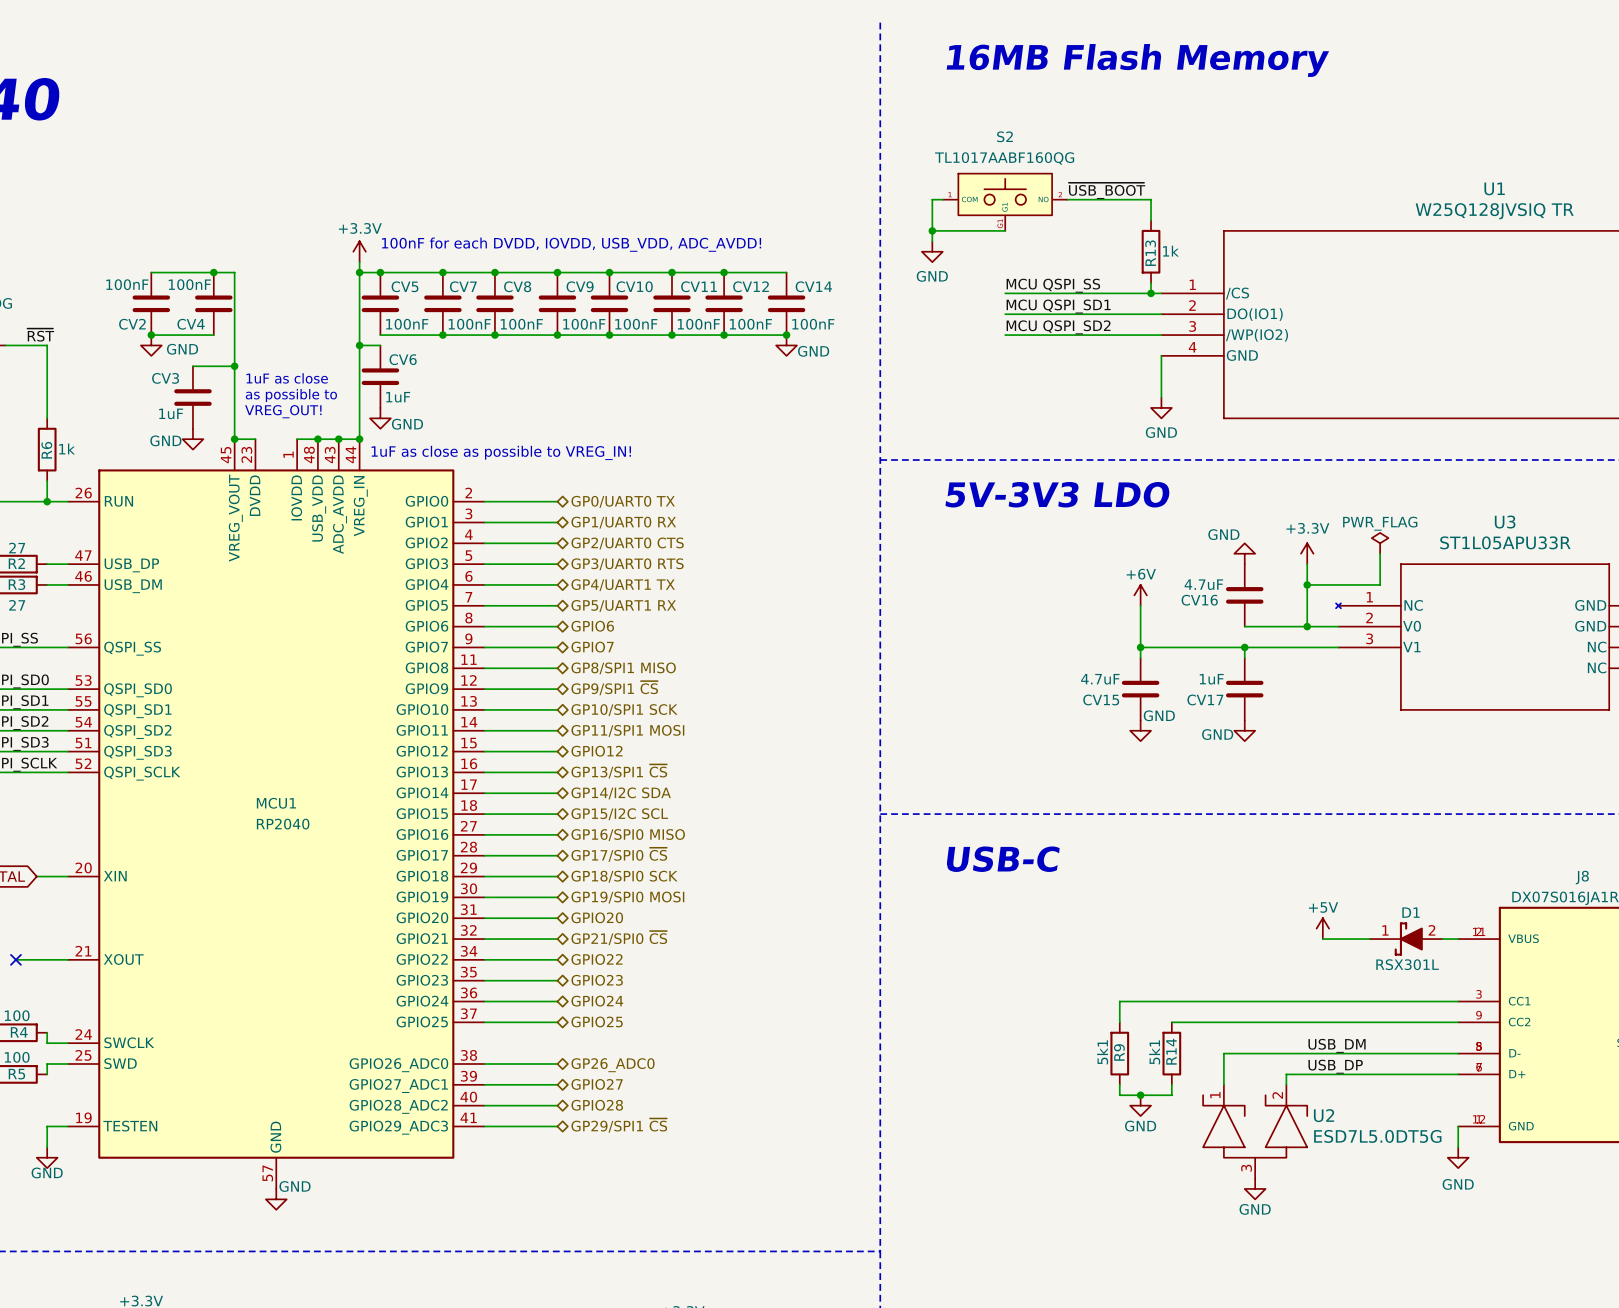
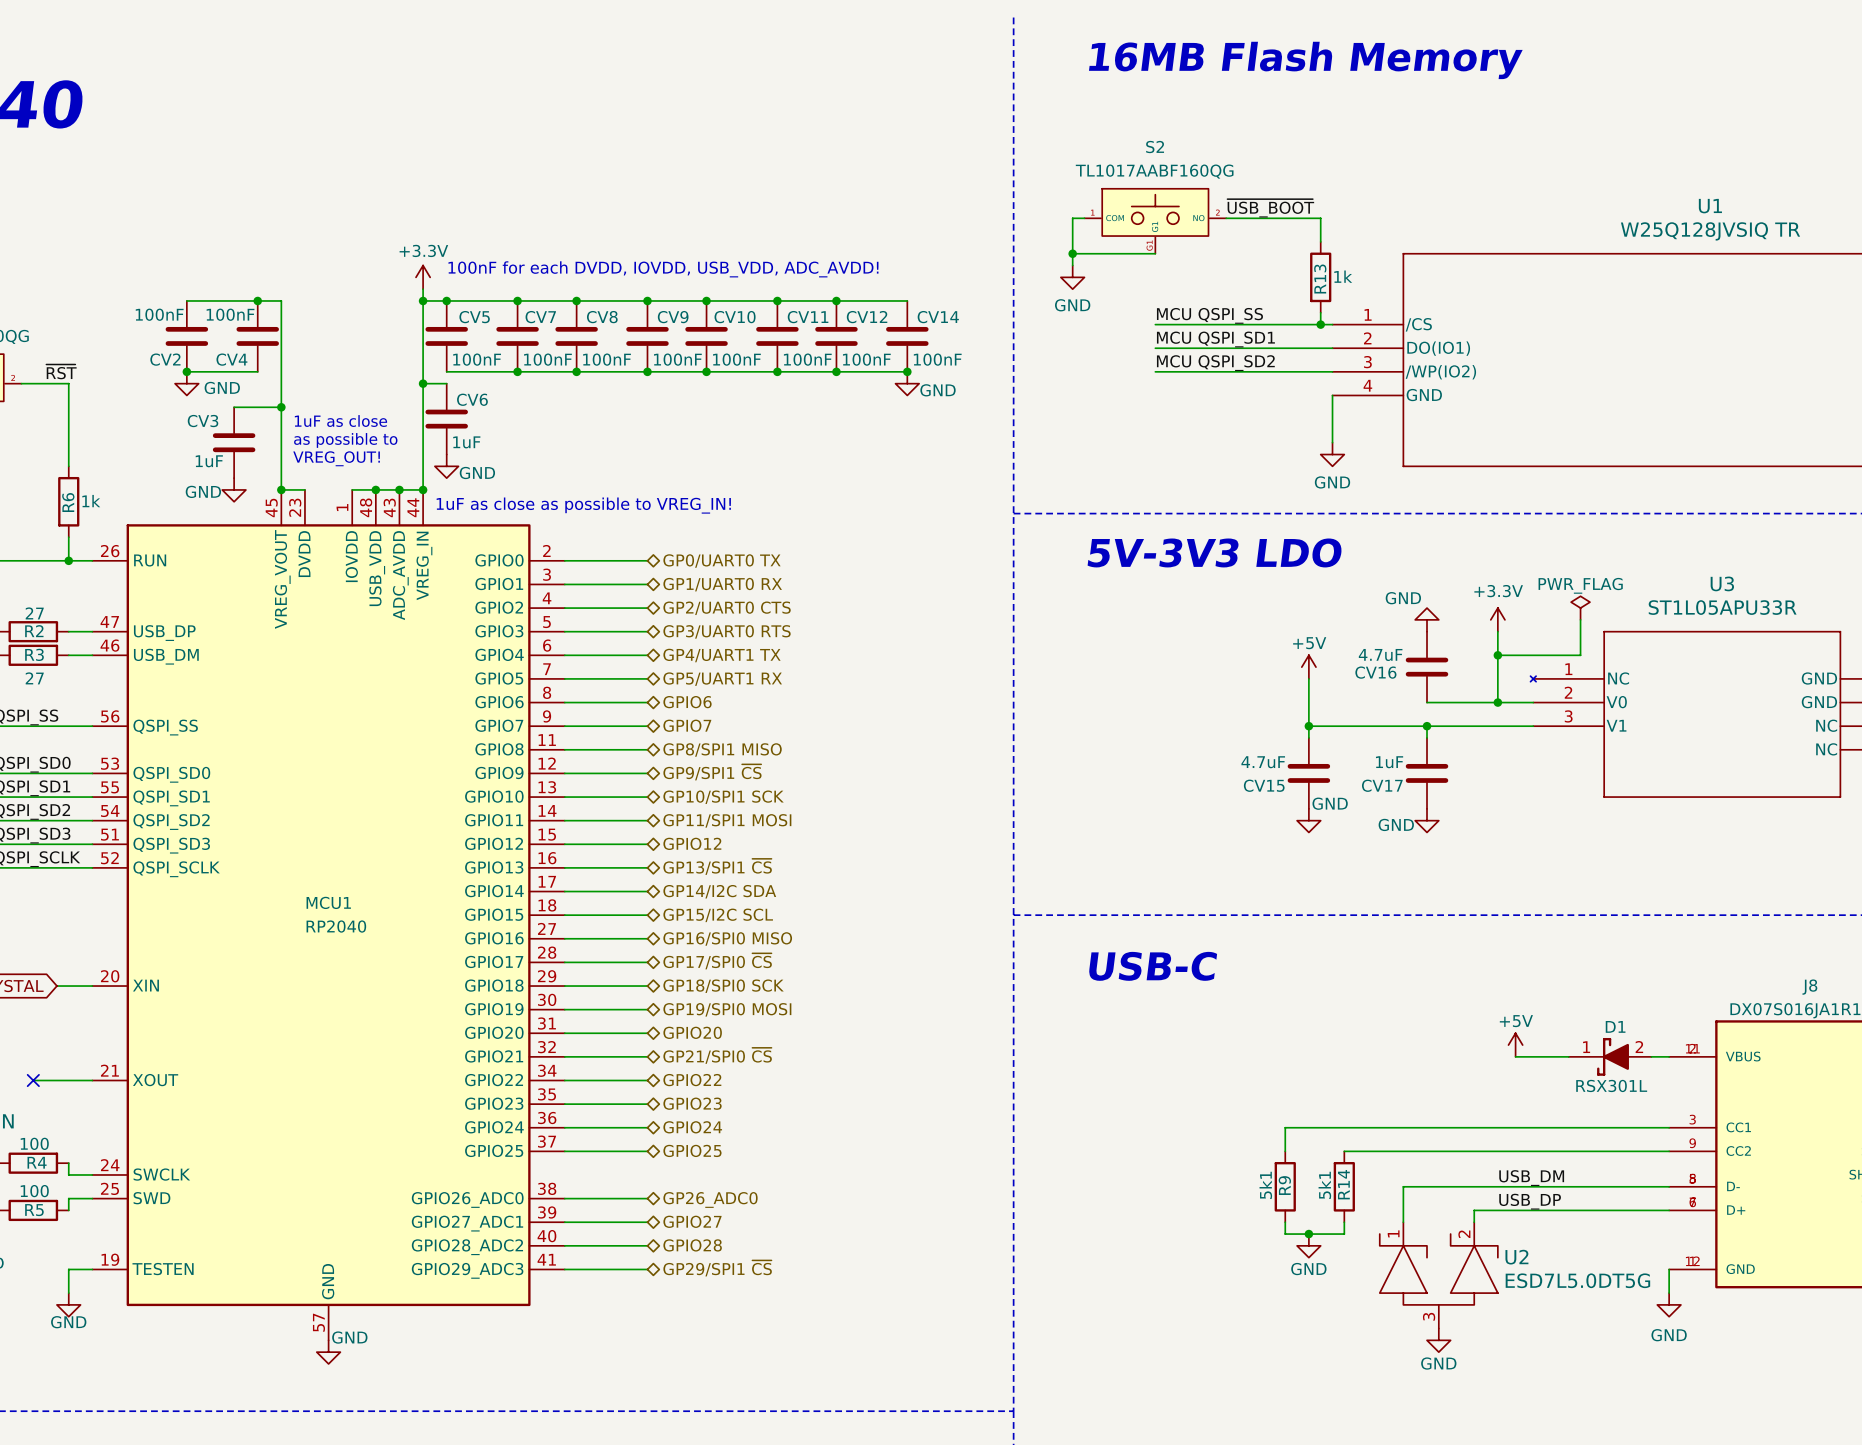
power symbol: +6V (1140, 595) -> +5V (1308, 667)

